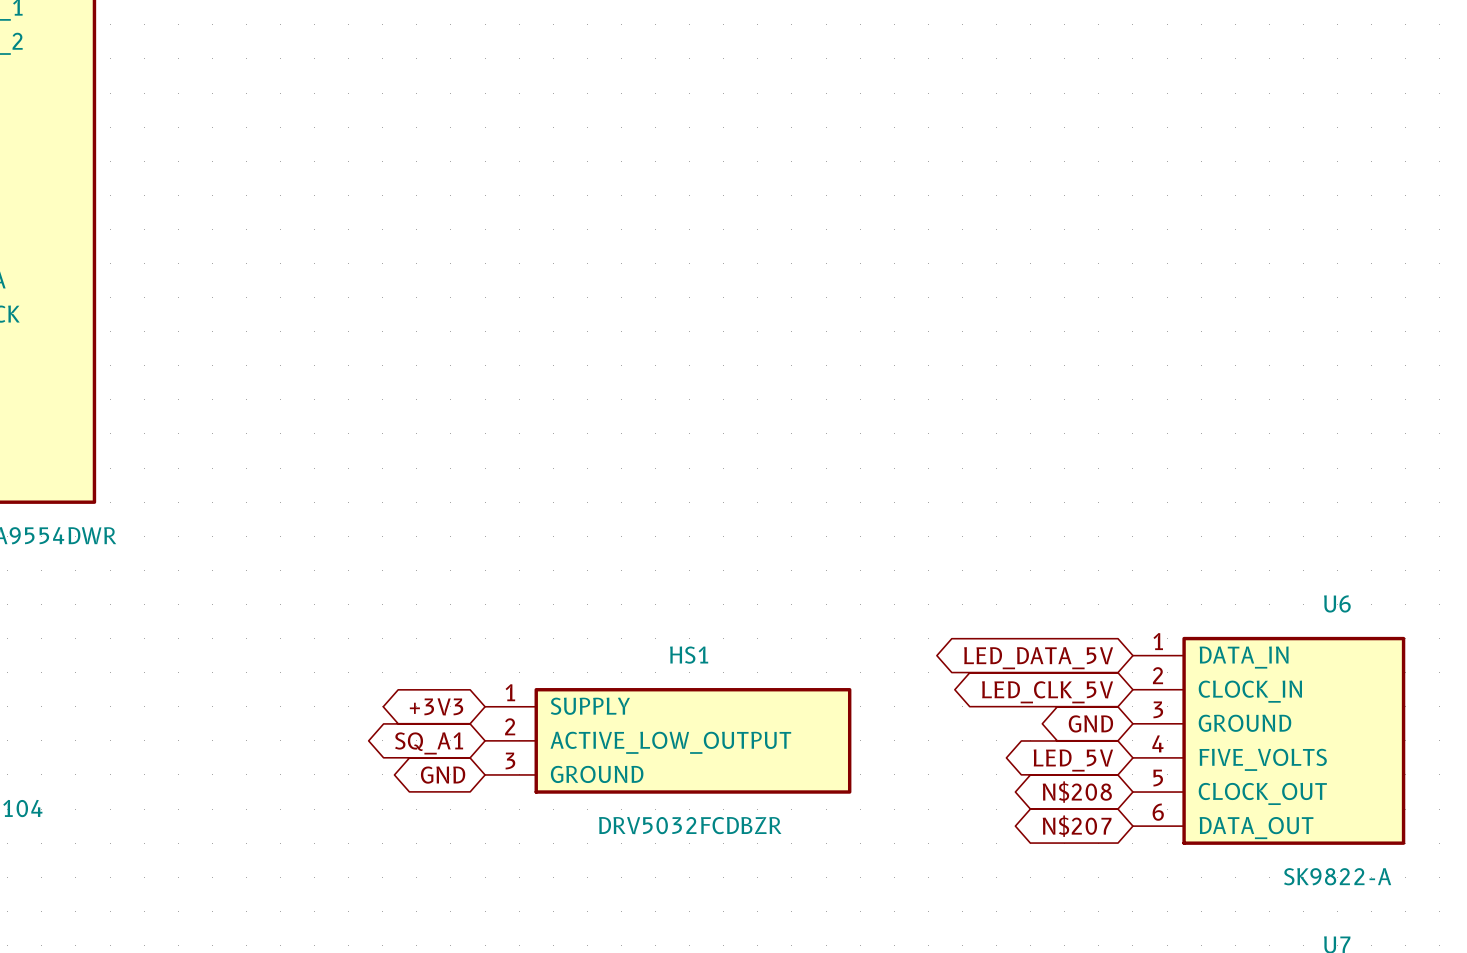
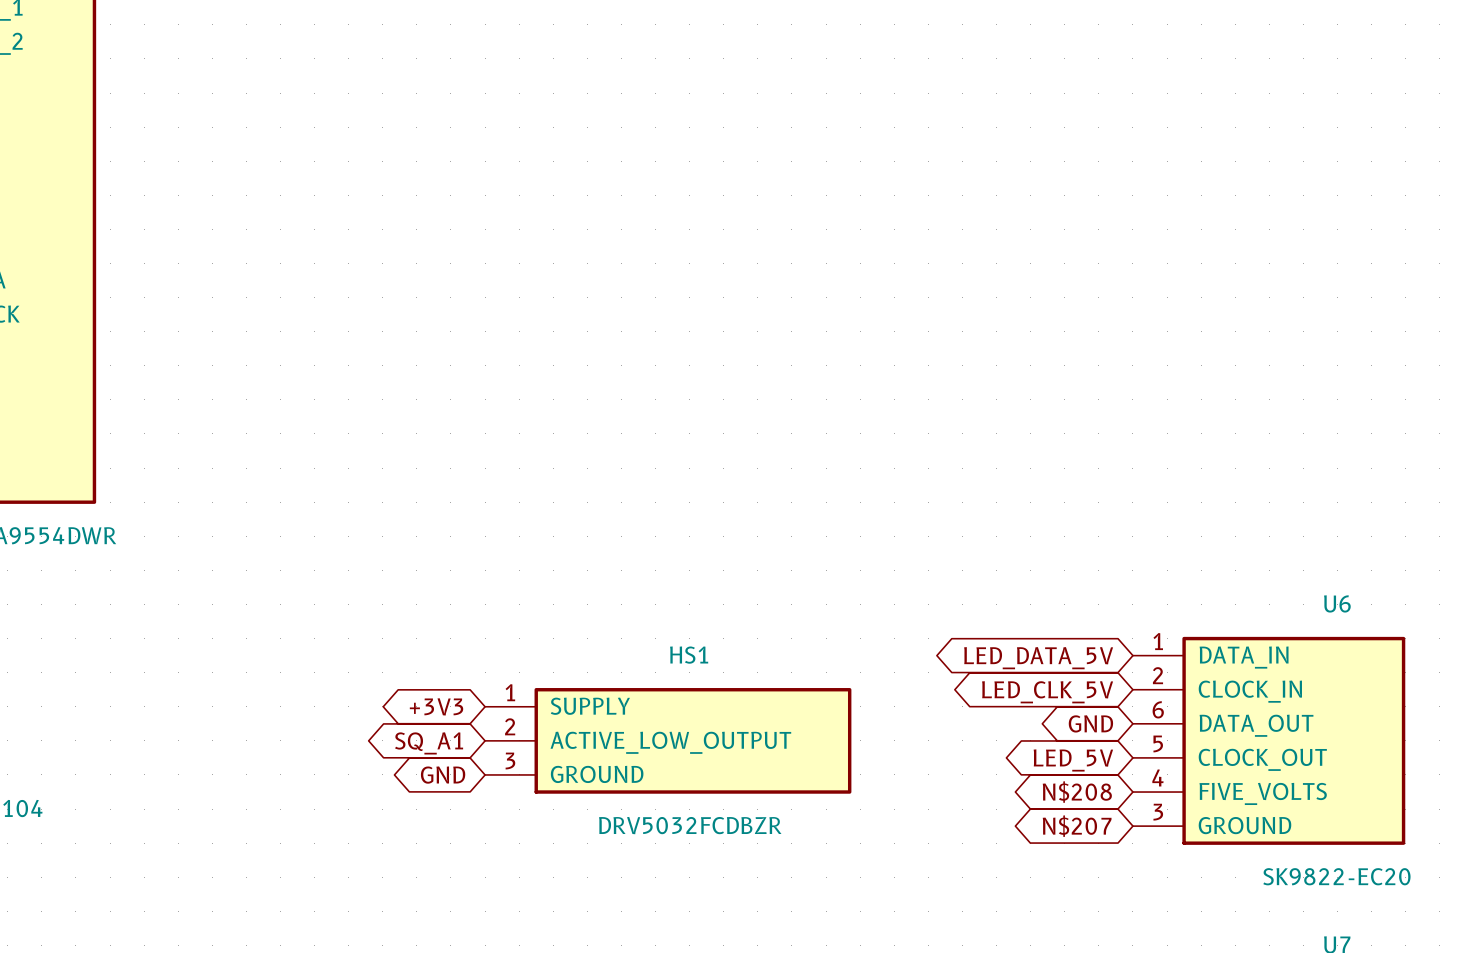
U6 pin number: 3 (1158, 709) -> 6 (1158, 709)
U6 pin name: GROUND (1244, 723) -> DATA_OUT (1256, 725)
U6 pin number: 4 (1157, 743) -> 5 (1158, 743)
U6 pin name: FIVE_VOLTS (1263, 759) -> CLOCK_OUT (1262, 759)
U6 pin number: 5 (1158, 778) -> 4 (1157, 777)
U6 pin name: CLOCK_OUT (1262, 793) -> FIVE_VOLTS (1263, 793)
U6 pin number: 6 (1158, 812) -> 3 (1158, 812)
U6 pin name: DATA_OUT (1256, 828) -> GROUND (1244, 825)
U6 value: SK9822-A (1337, 876) -> SK9822-EC20 (1336, 876)

